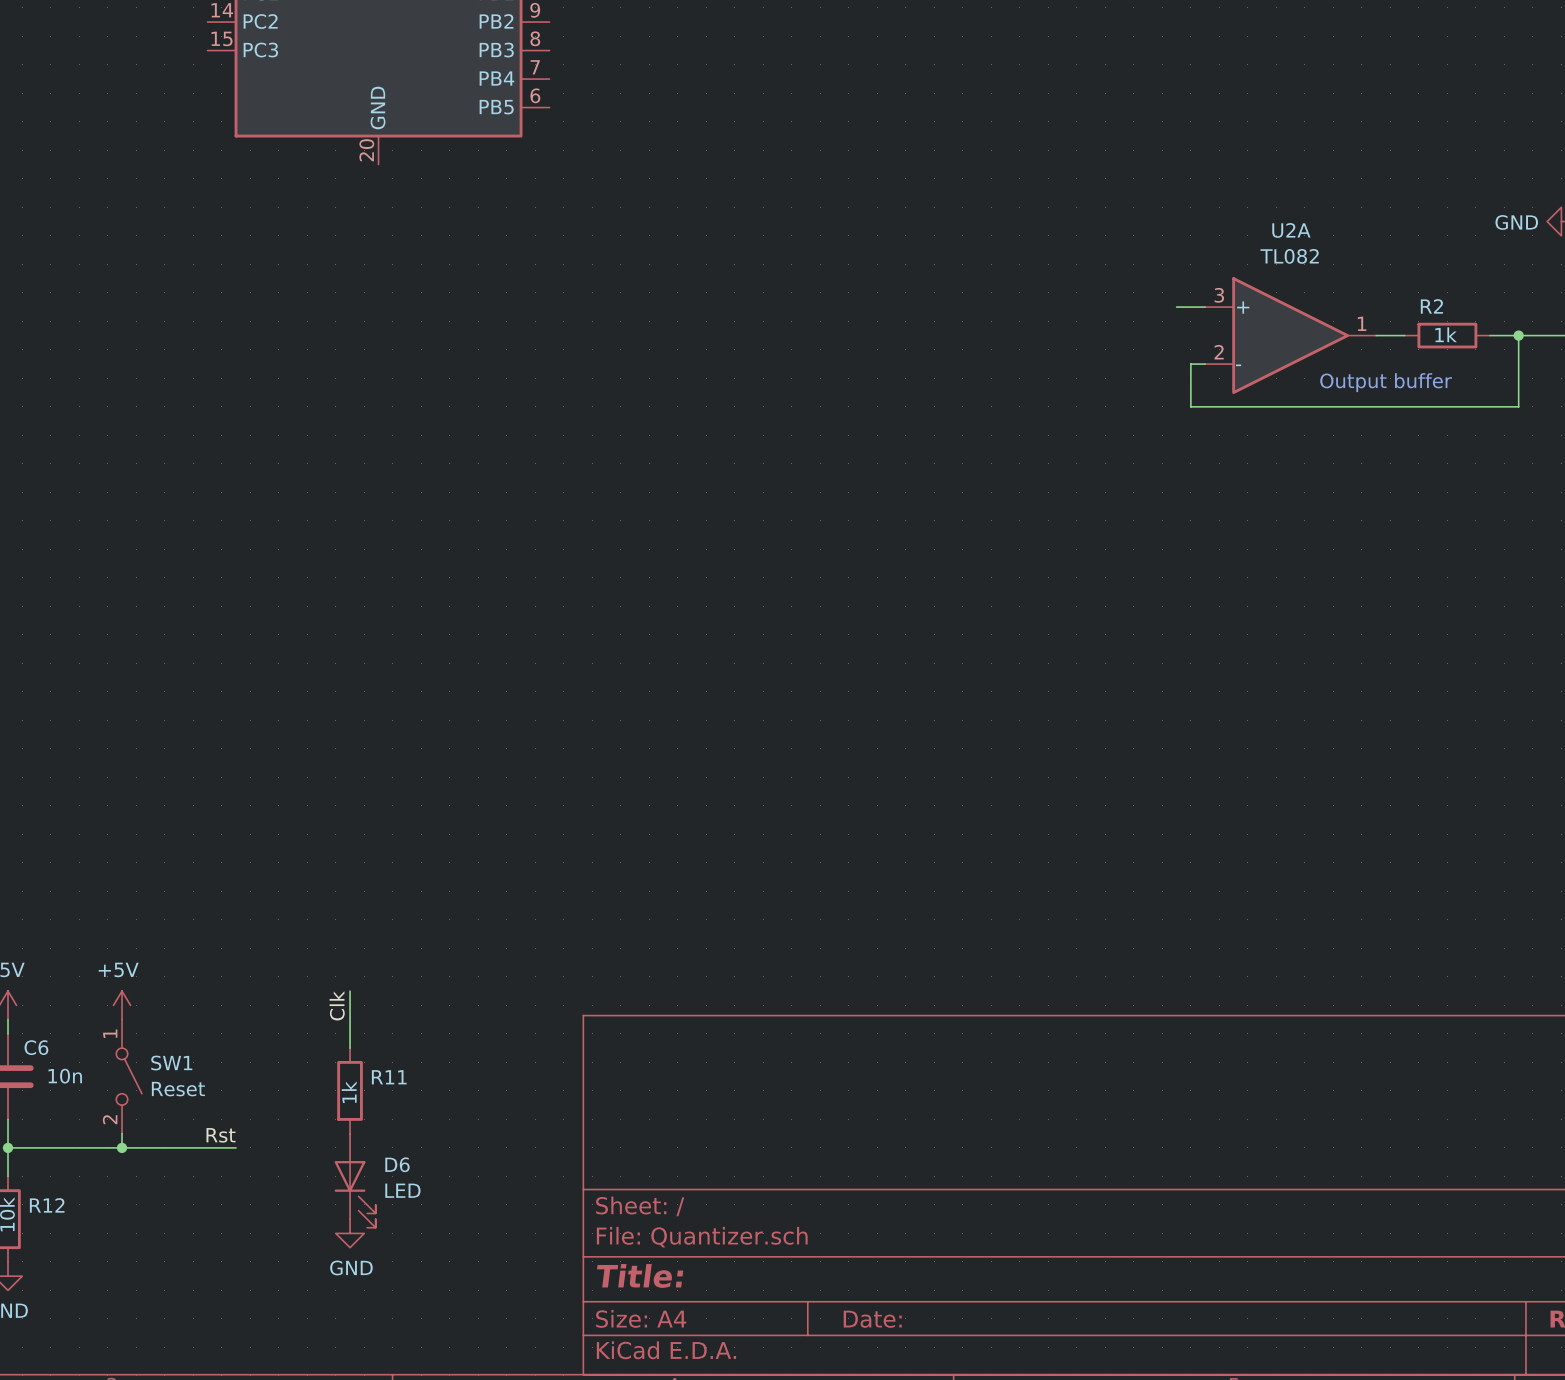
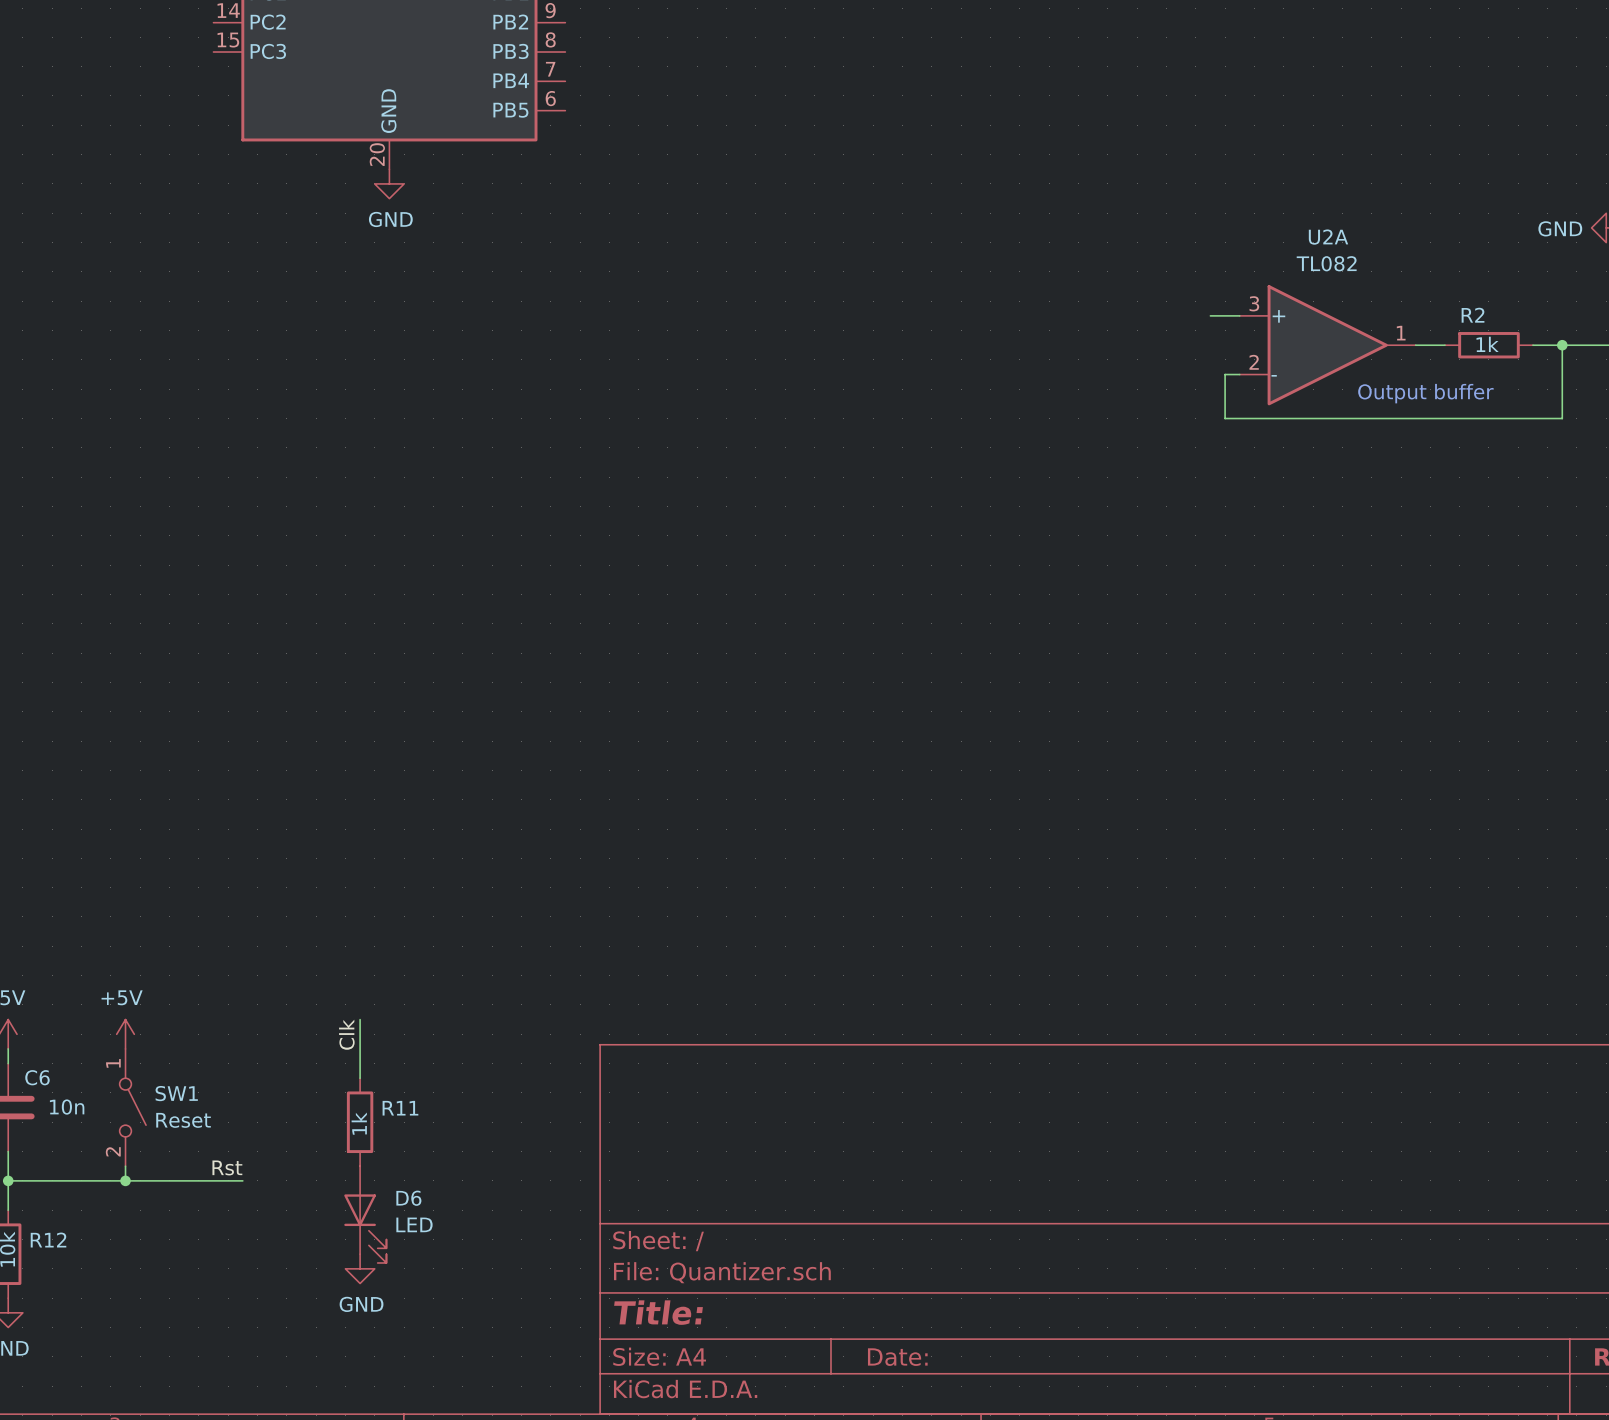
power symbol: none -> GND (389, 183)

